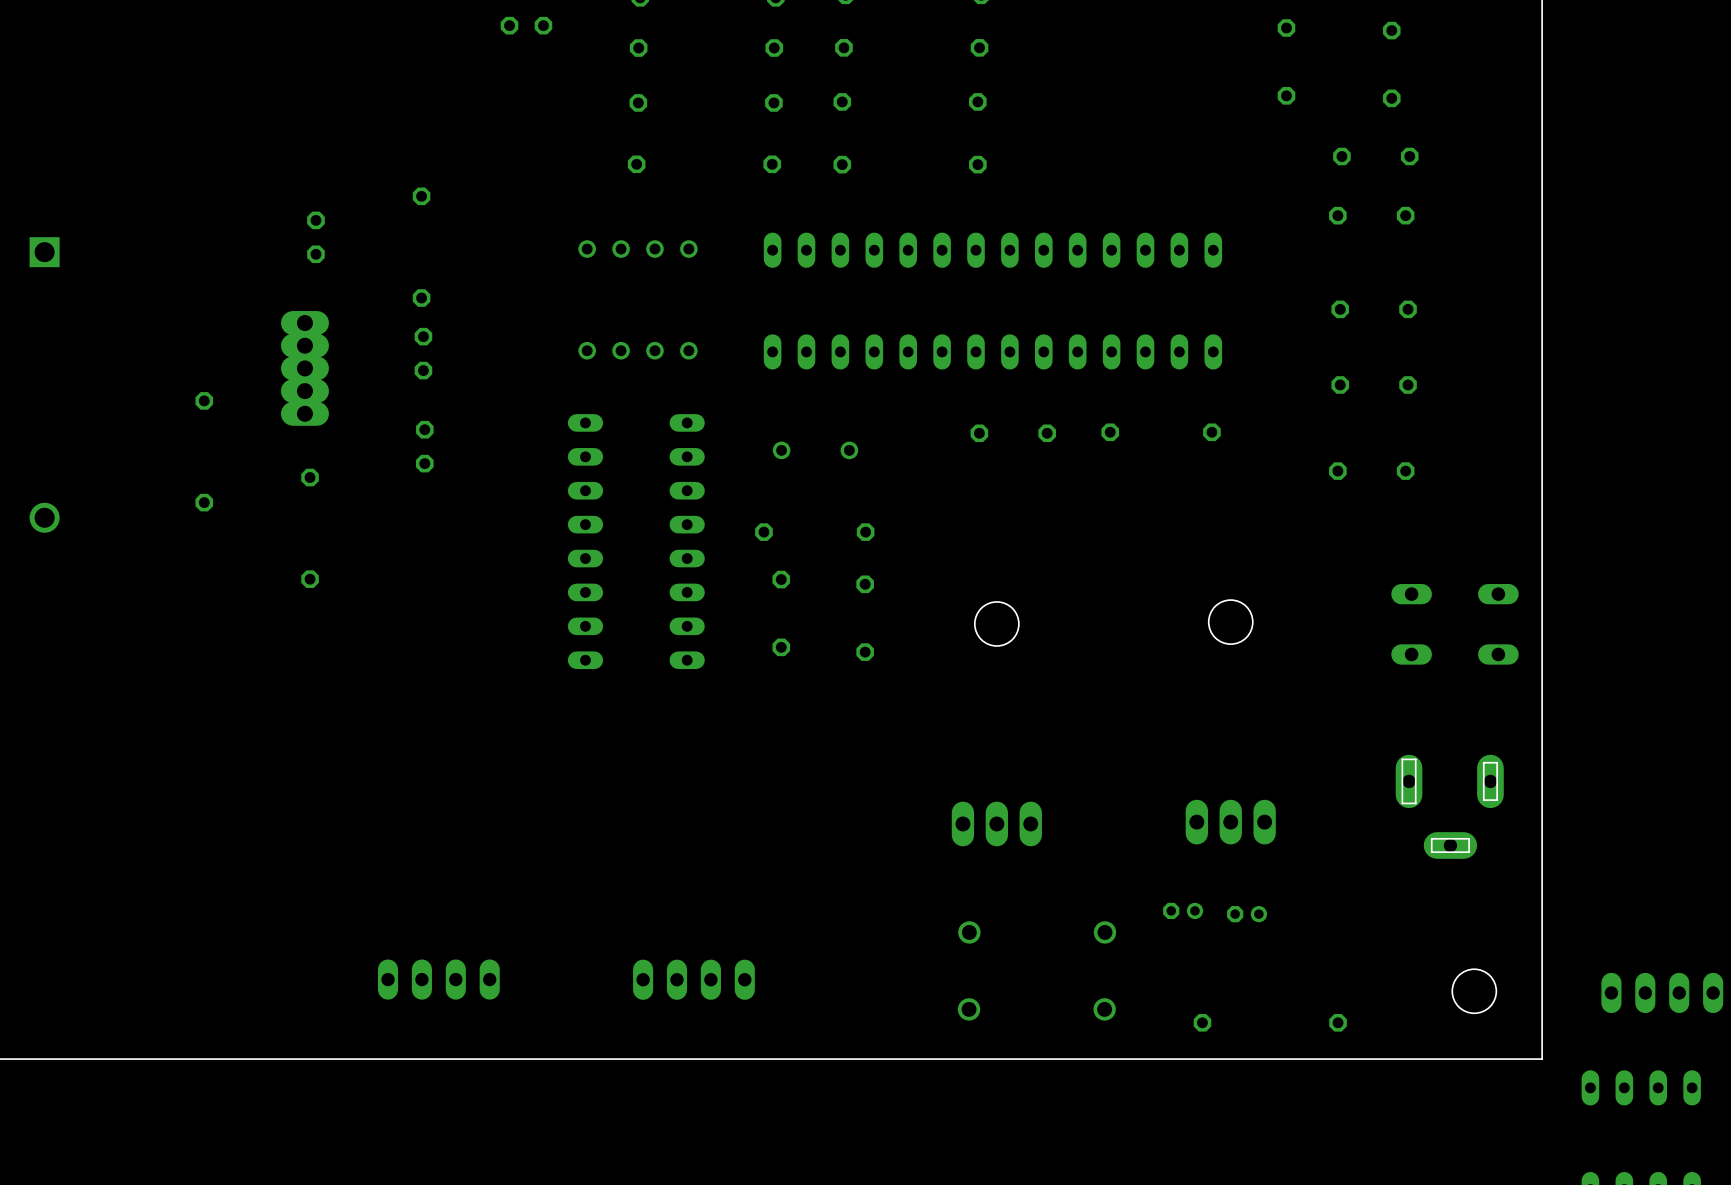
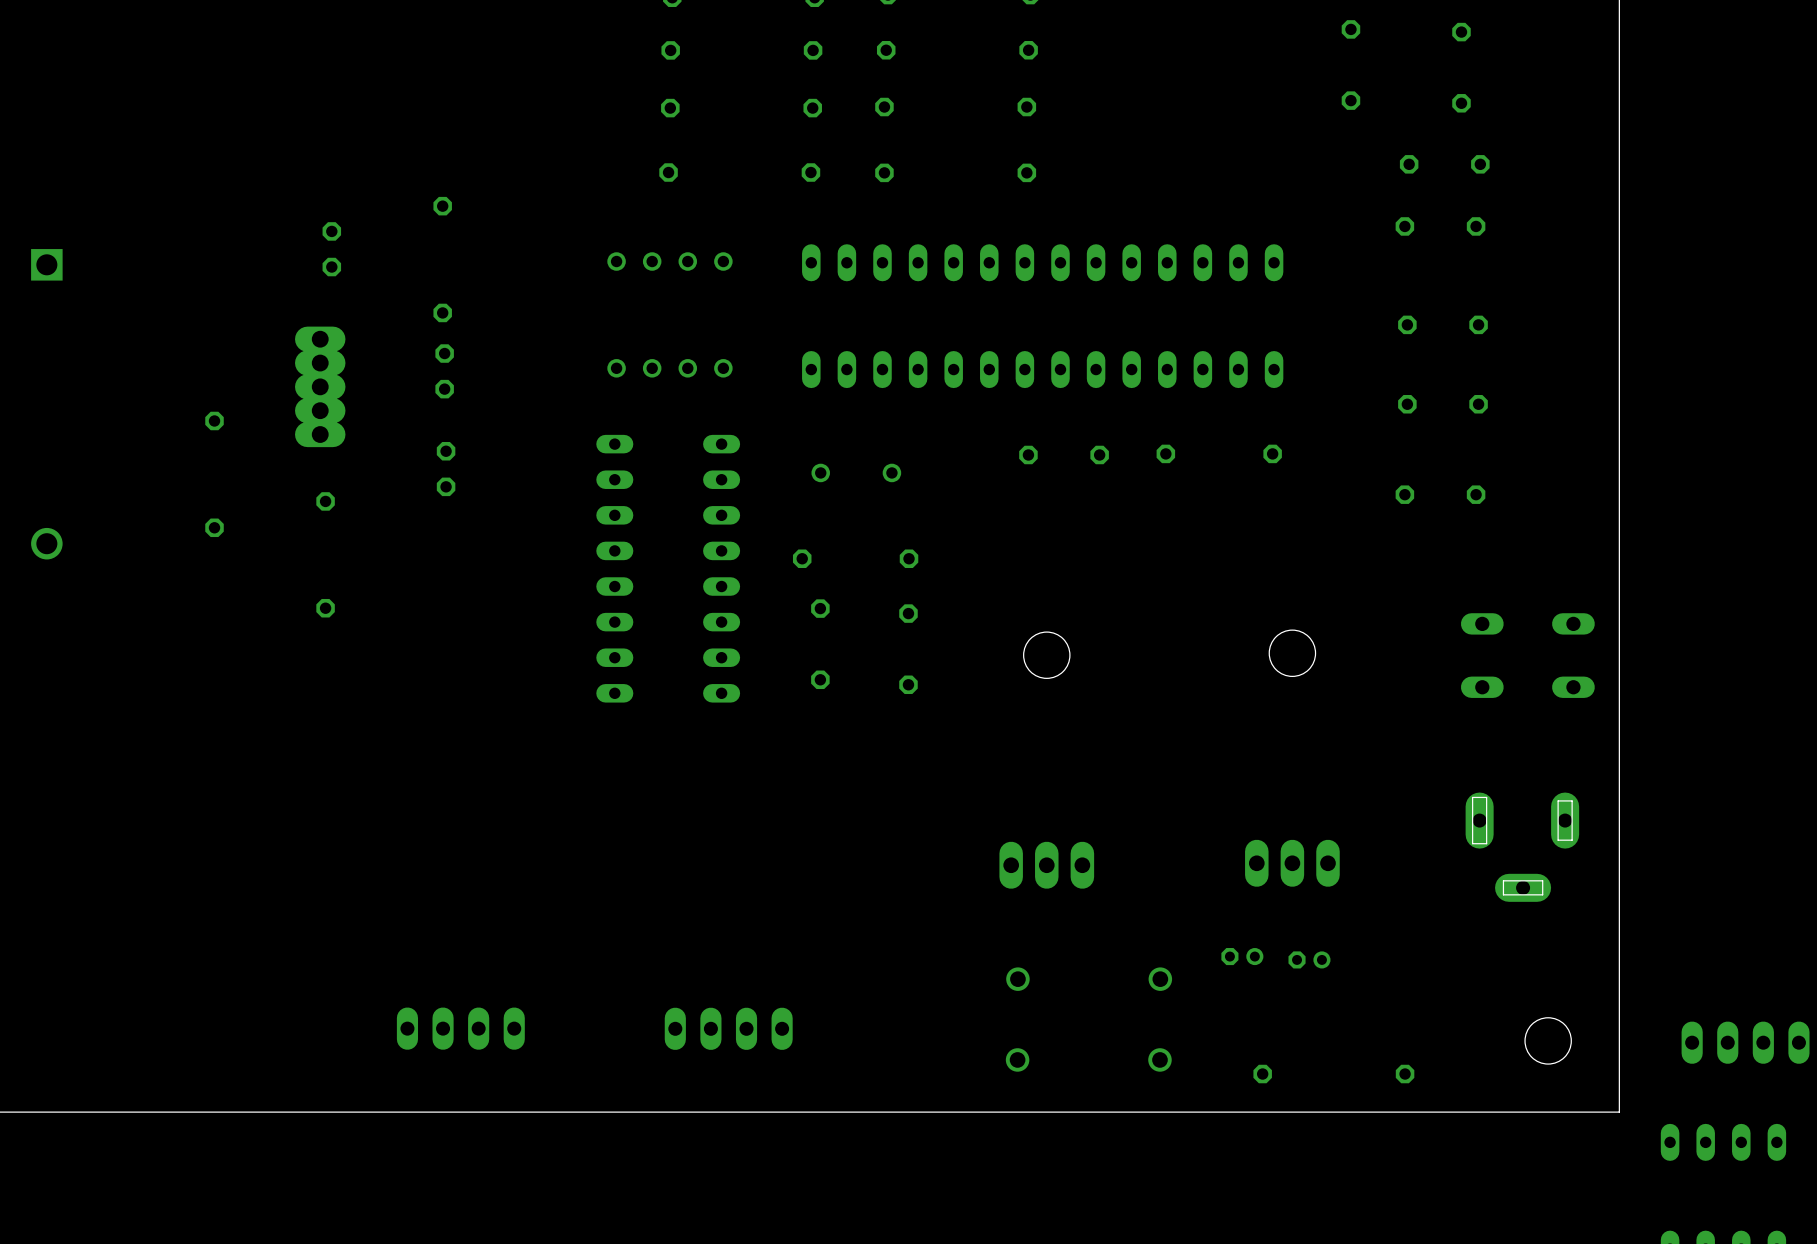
part: (526, 25) -> none

